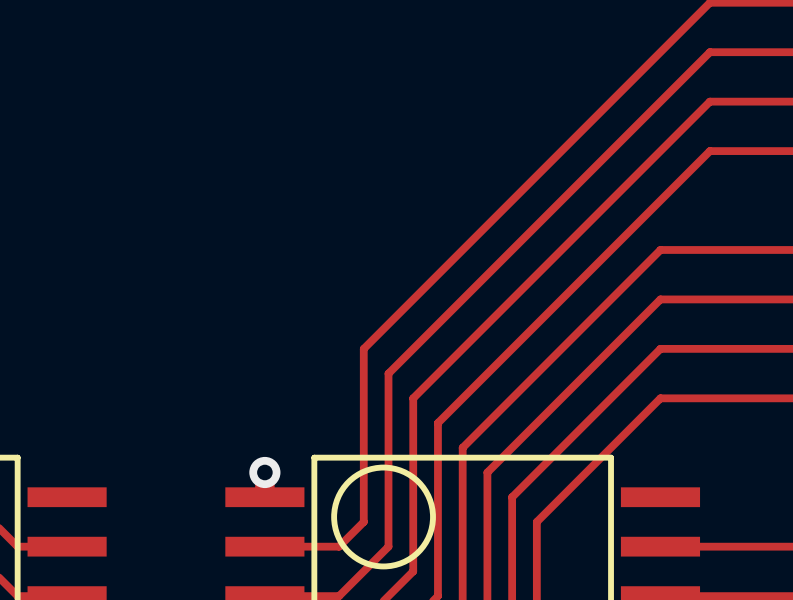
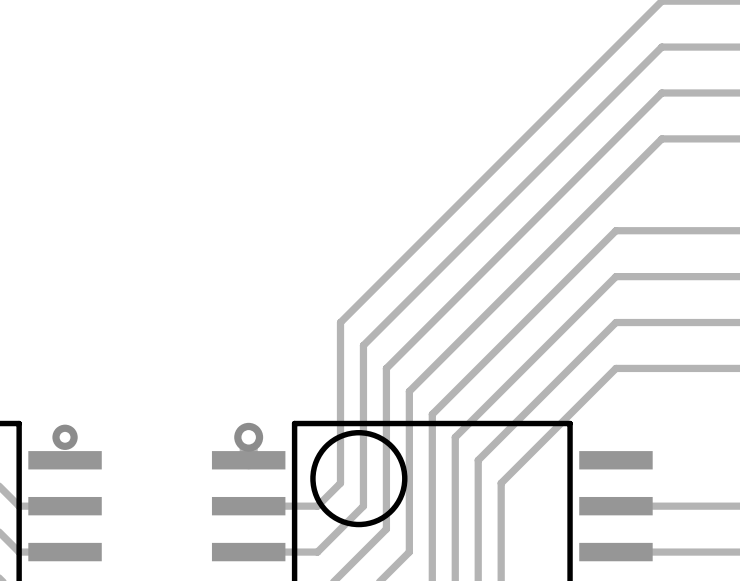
via: none -> (65, 437)

